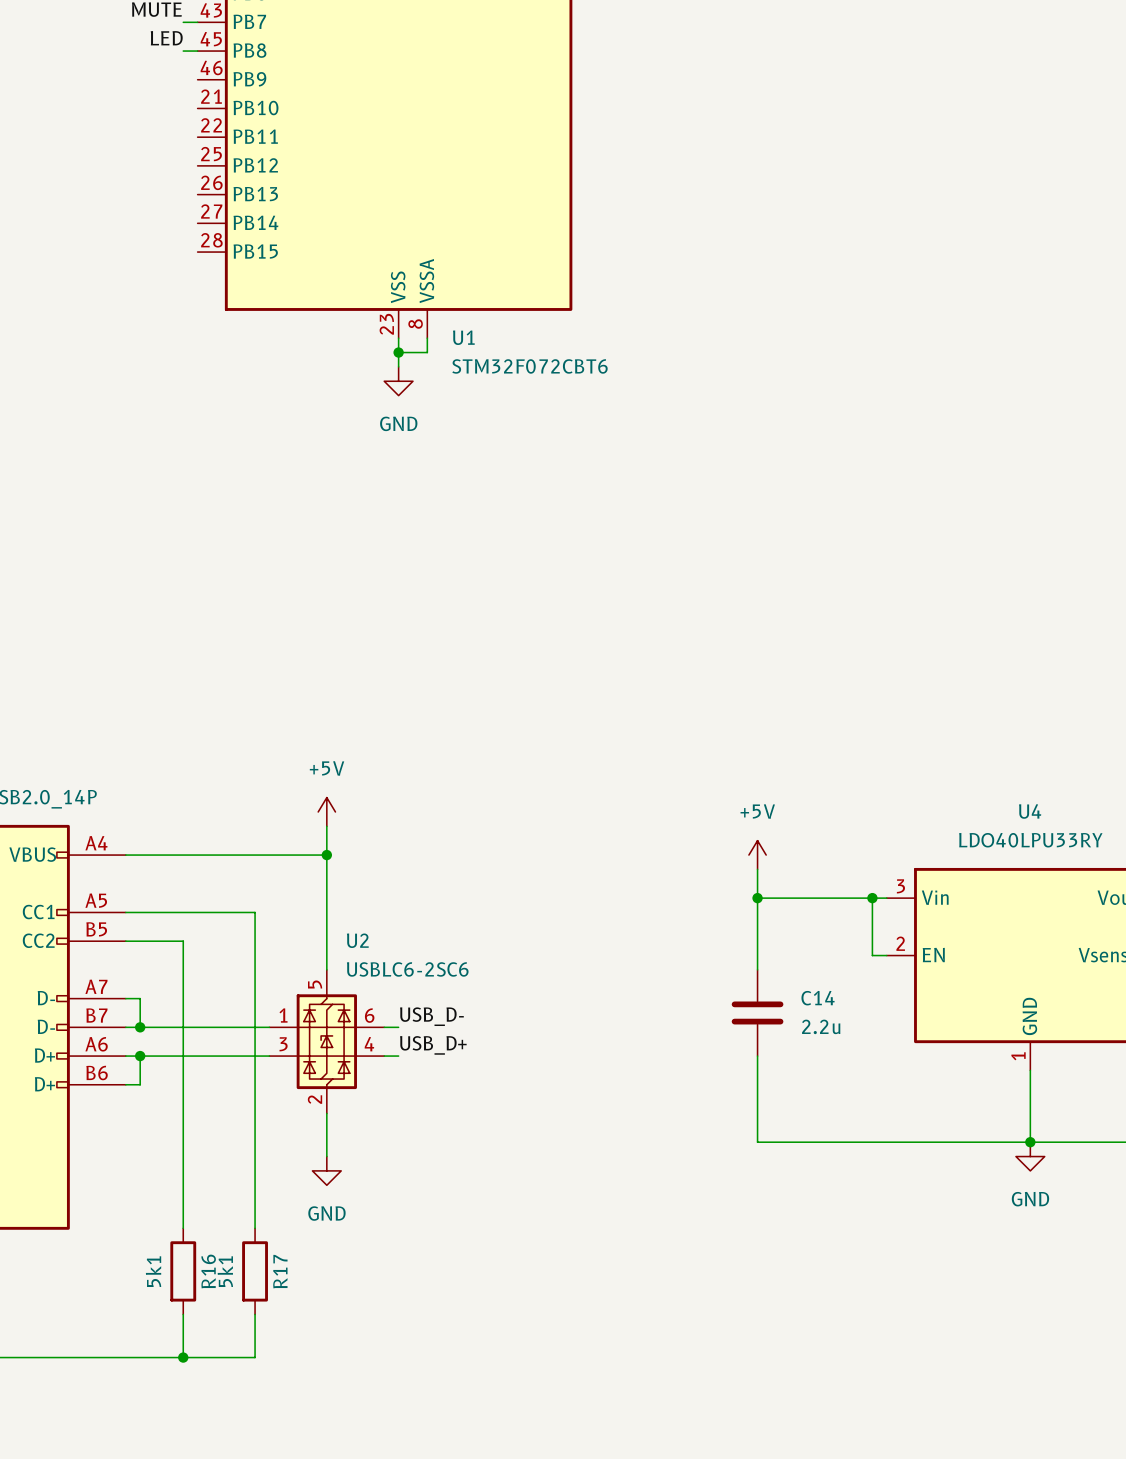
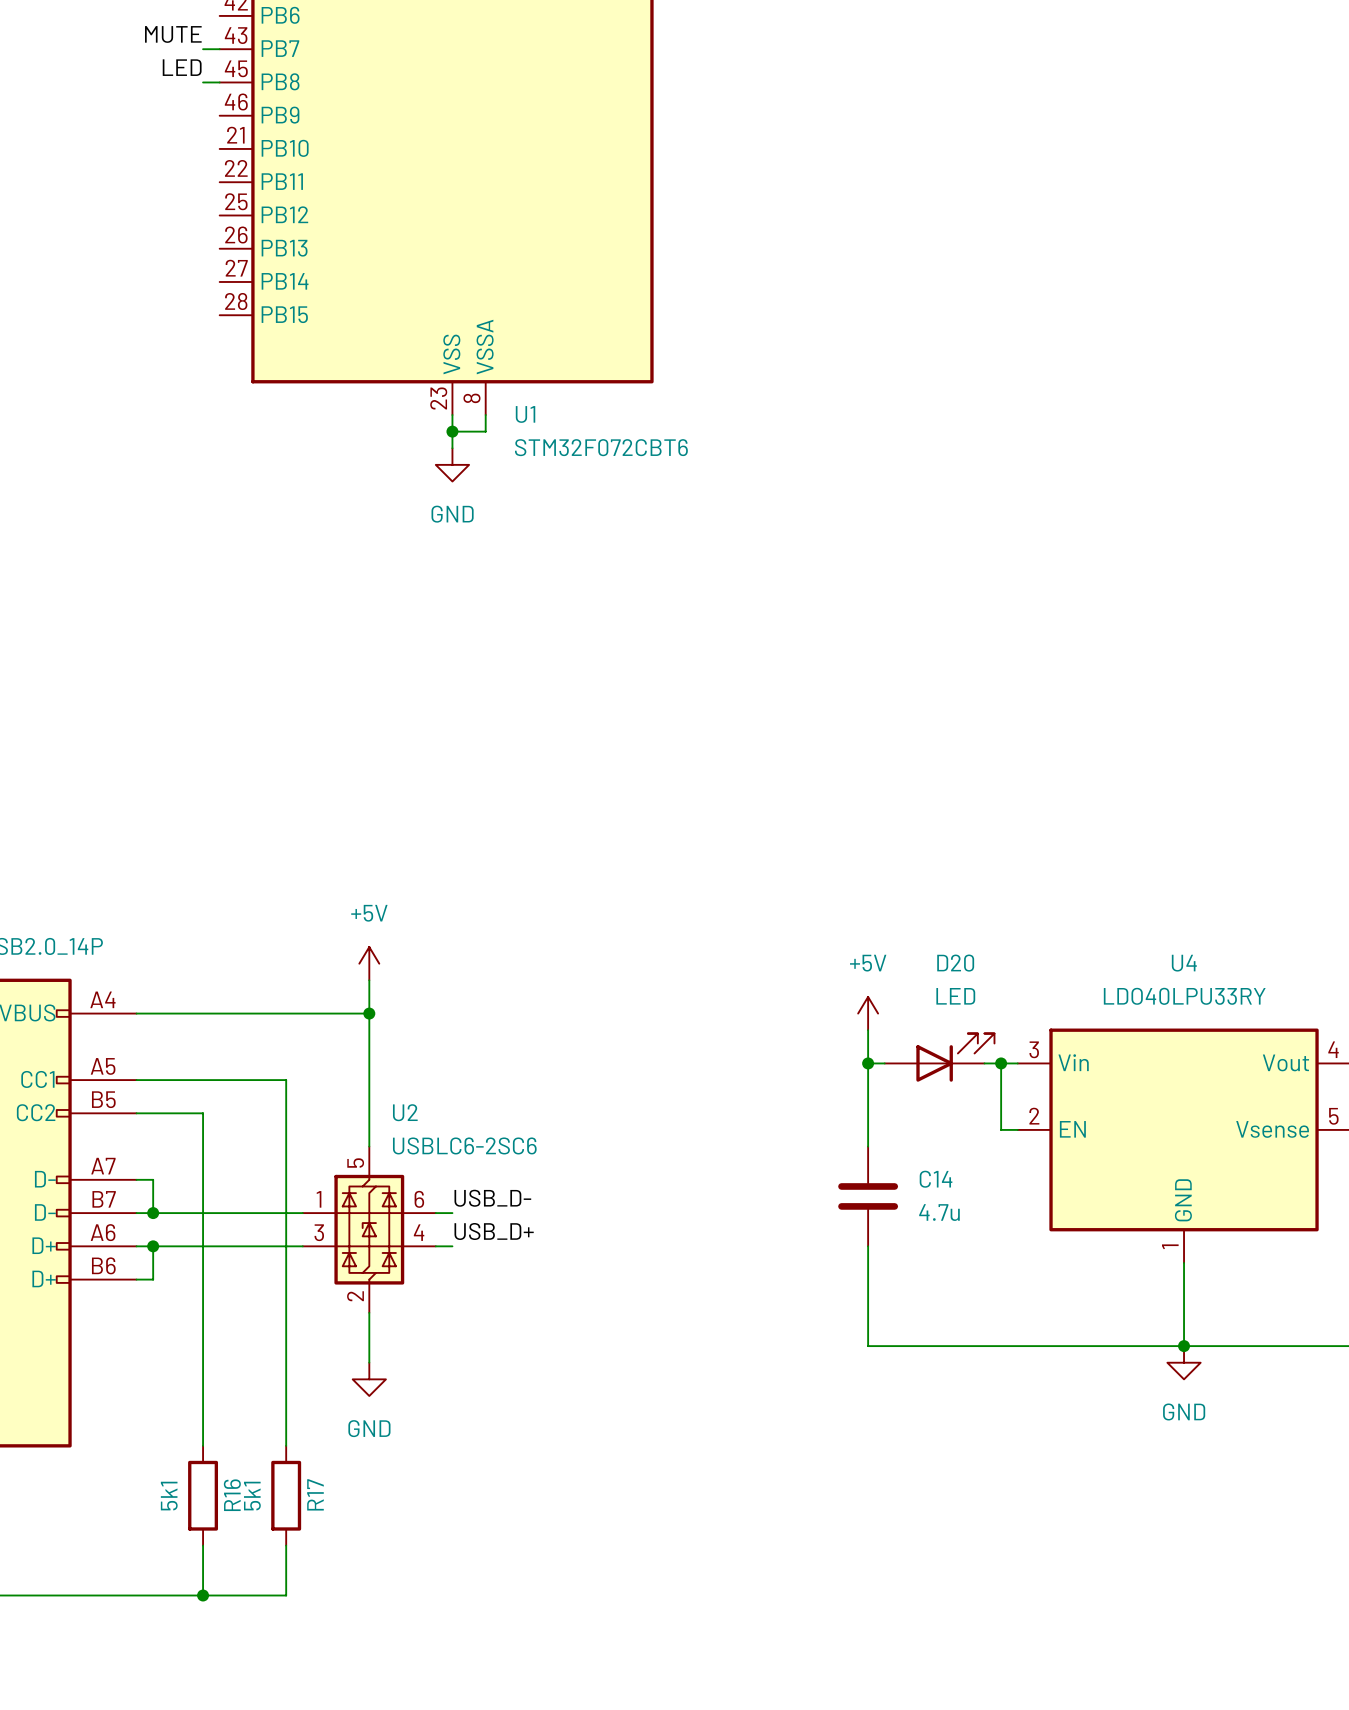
D20: none -> LED (939, 1057)
C14 value: 2.2u (821, 1026) -> 4.7u (939, 1212)

